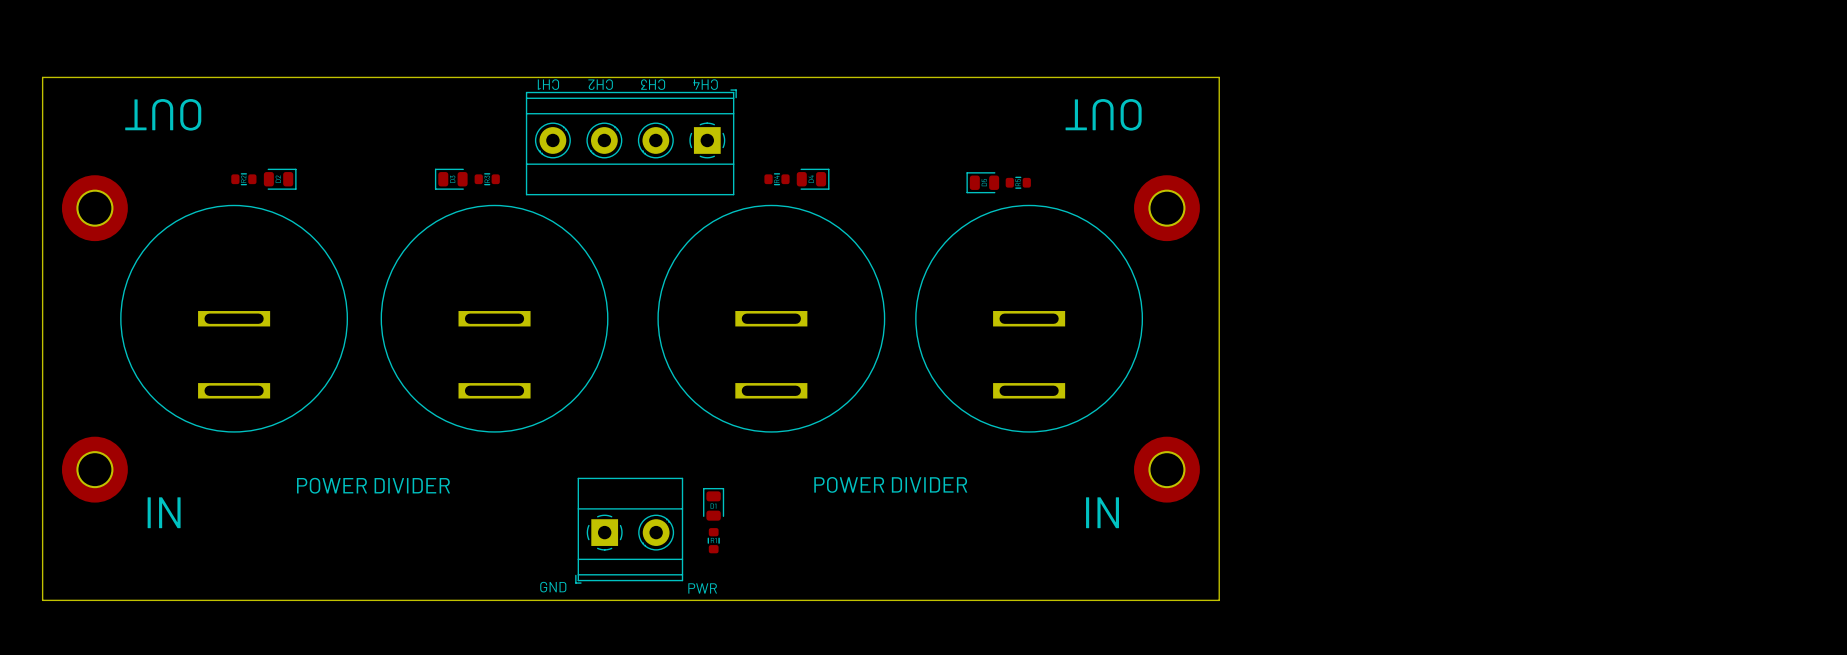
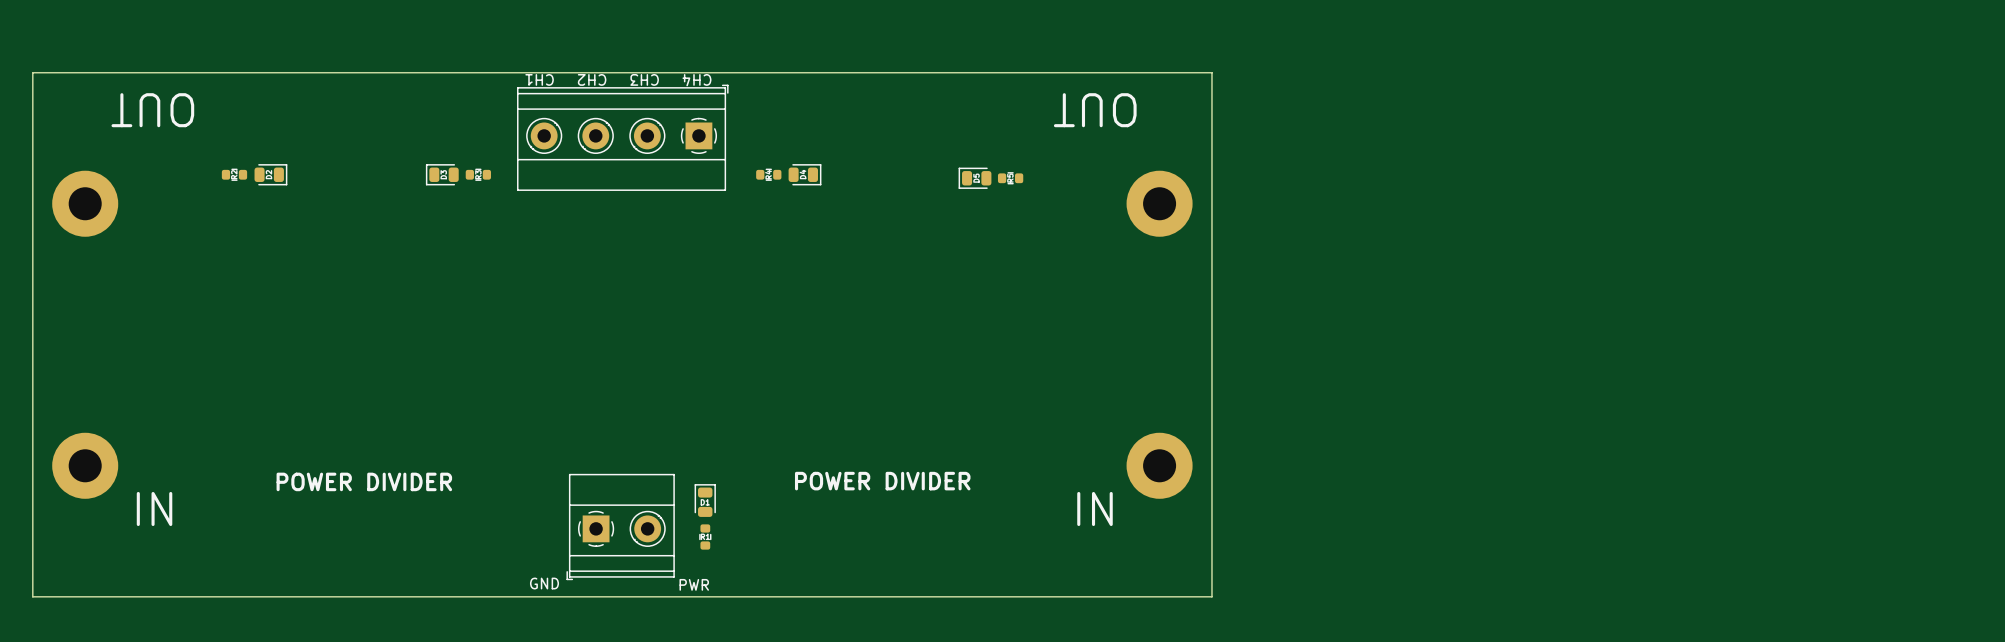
part: (234, 318) -> none
part: (494, 318) -> none
part: (771, 318) -> none
part: (1029, 318) -> none

